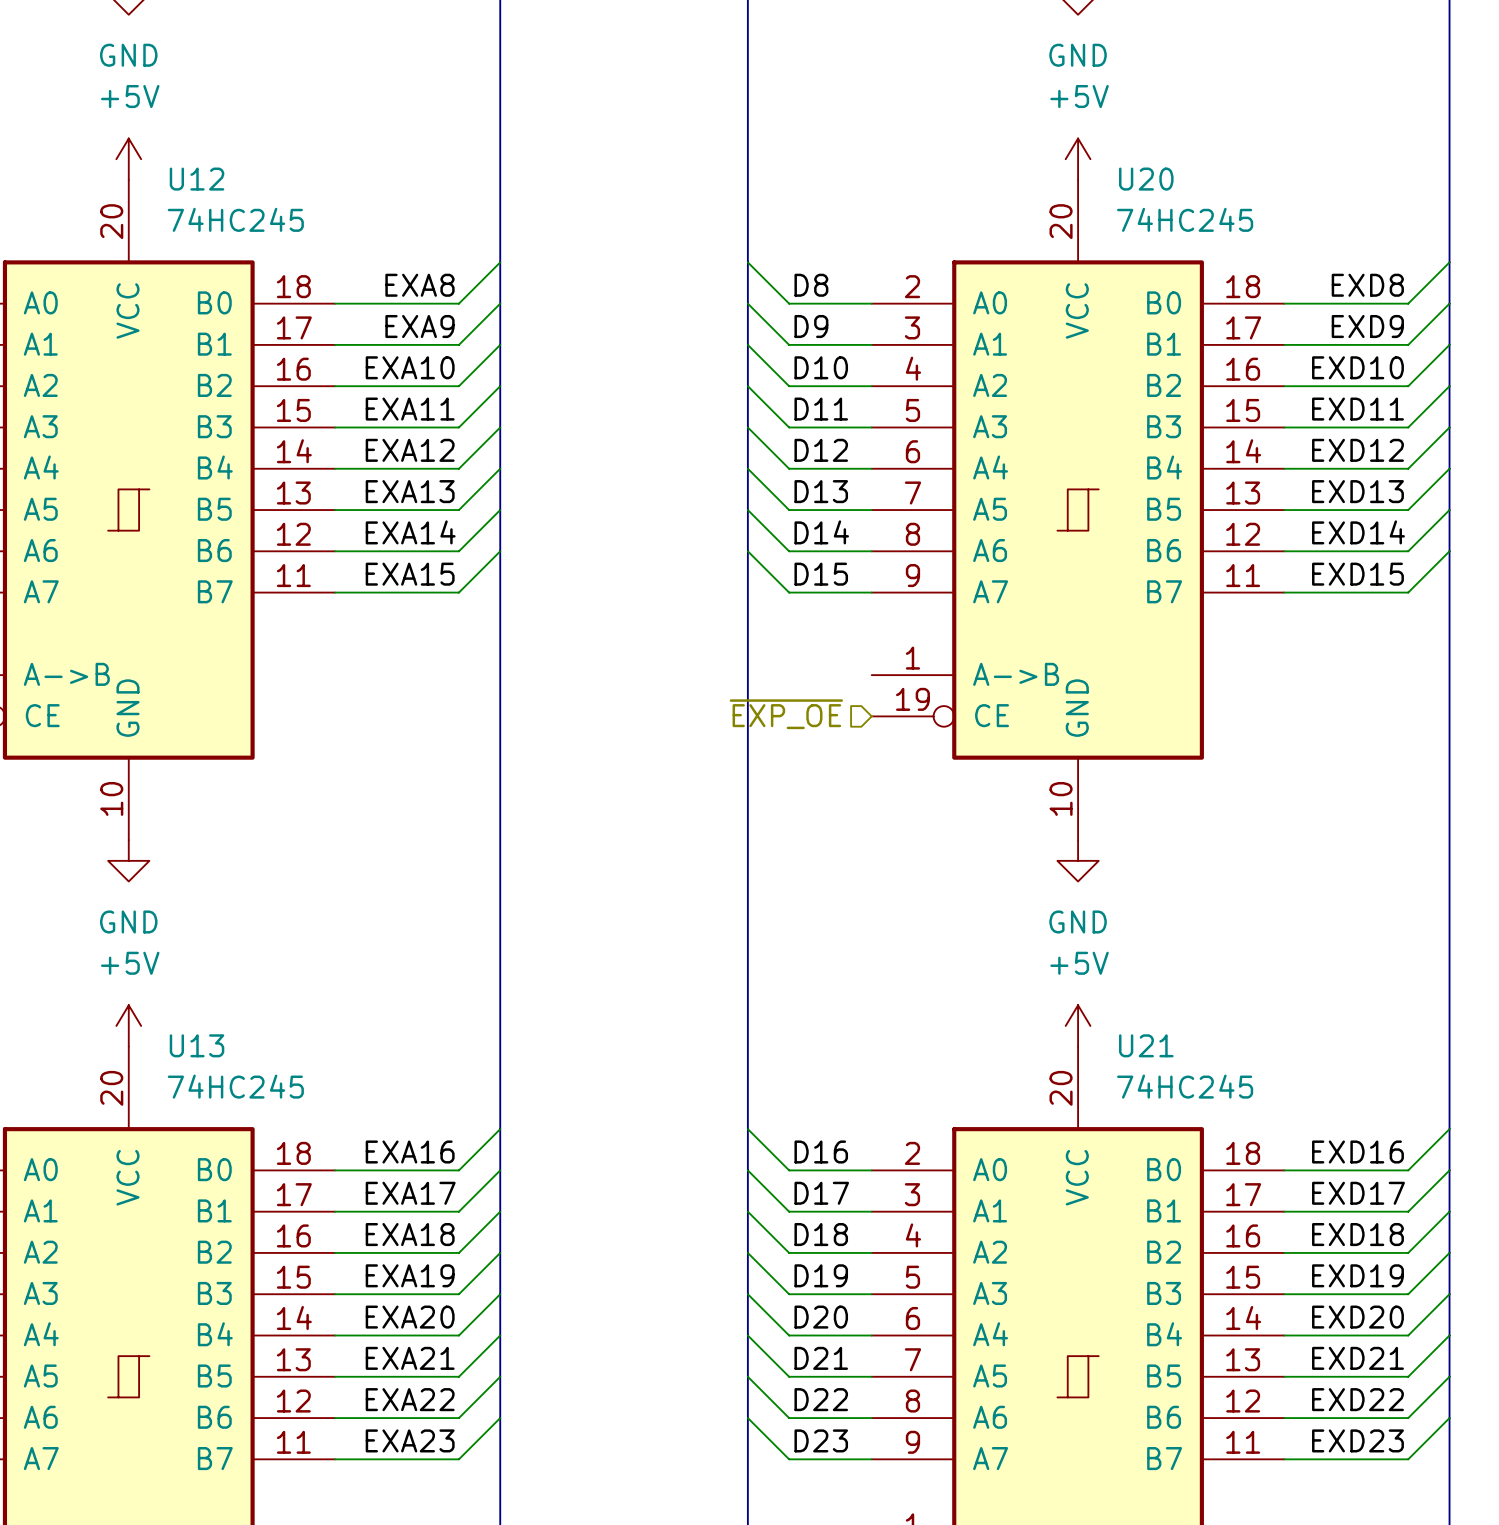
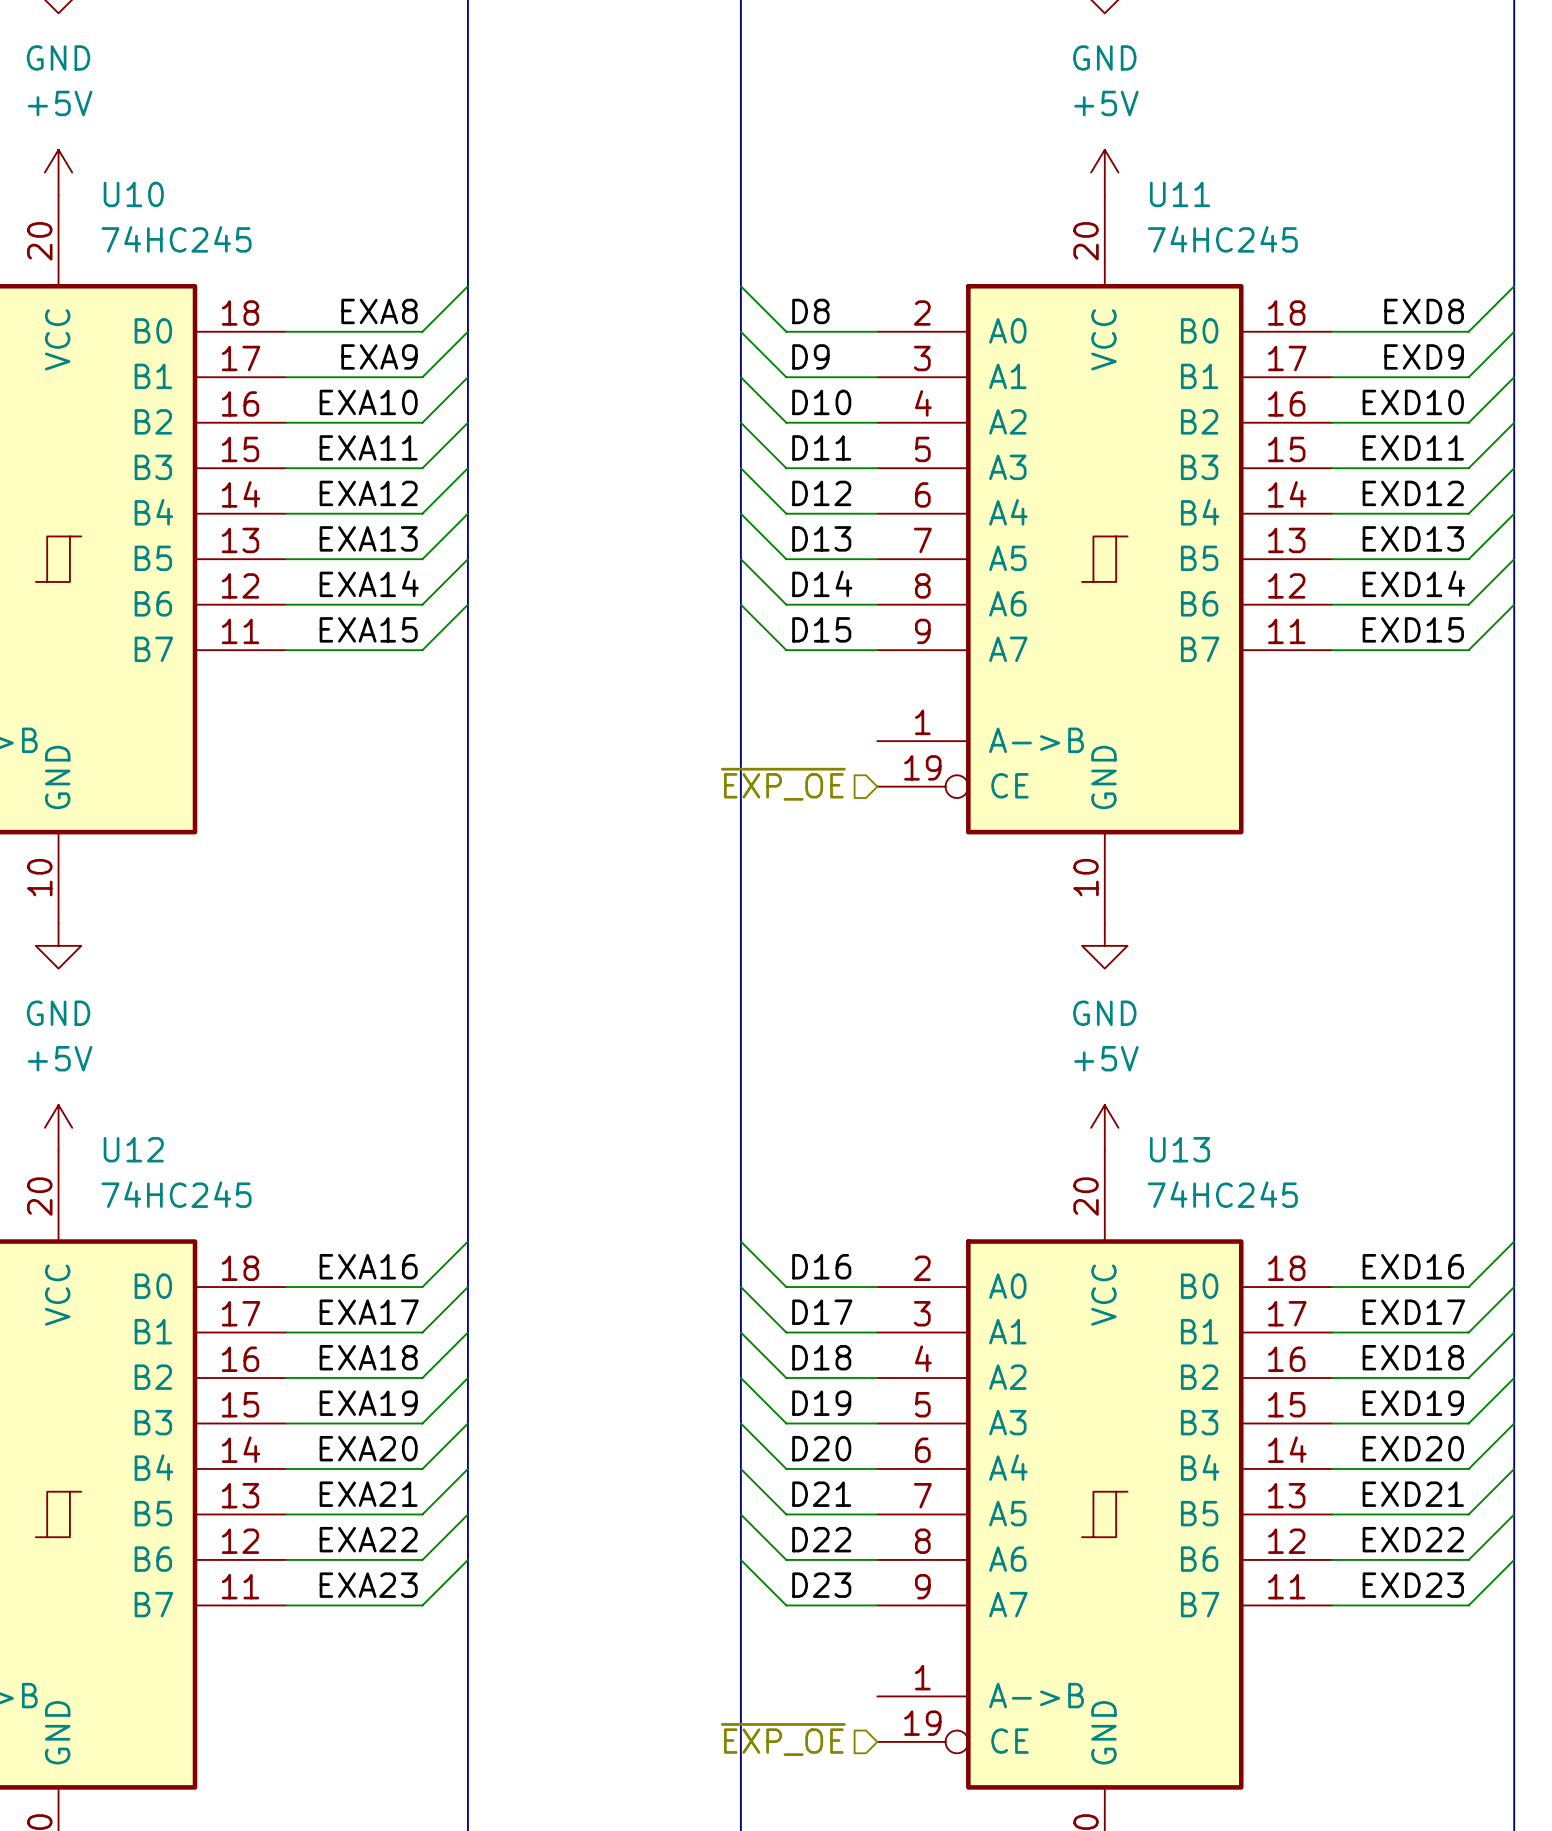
U12 name: U12 (197, 179) -> U10 (133, 194)
U20 name: U20 (1146, 179) -> U11 (1180, 194)
U13 name: U13 (197, 1045) -> U12 (133, 1149)
U21 name: U21 (1146, 1045) -> U13 (1180, 1149)

